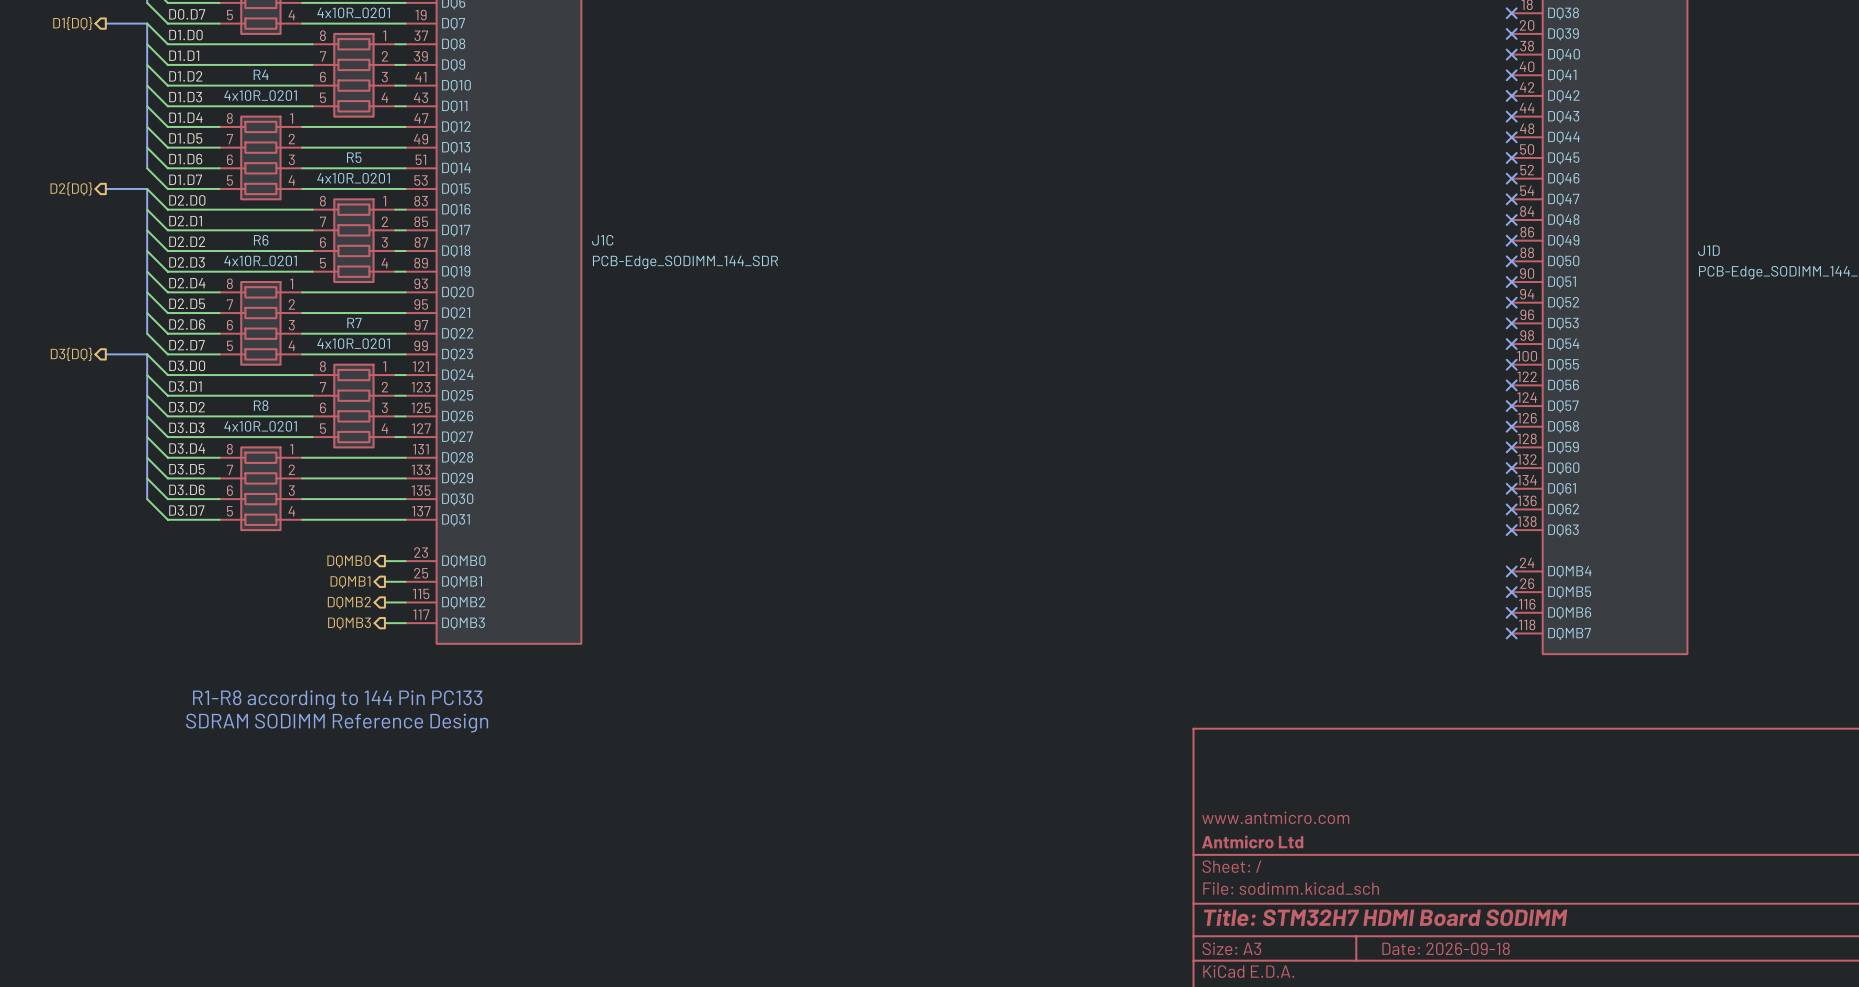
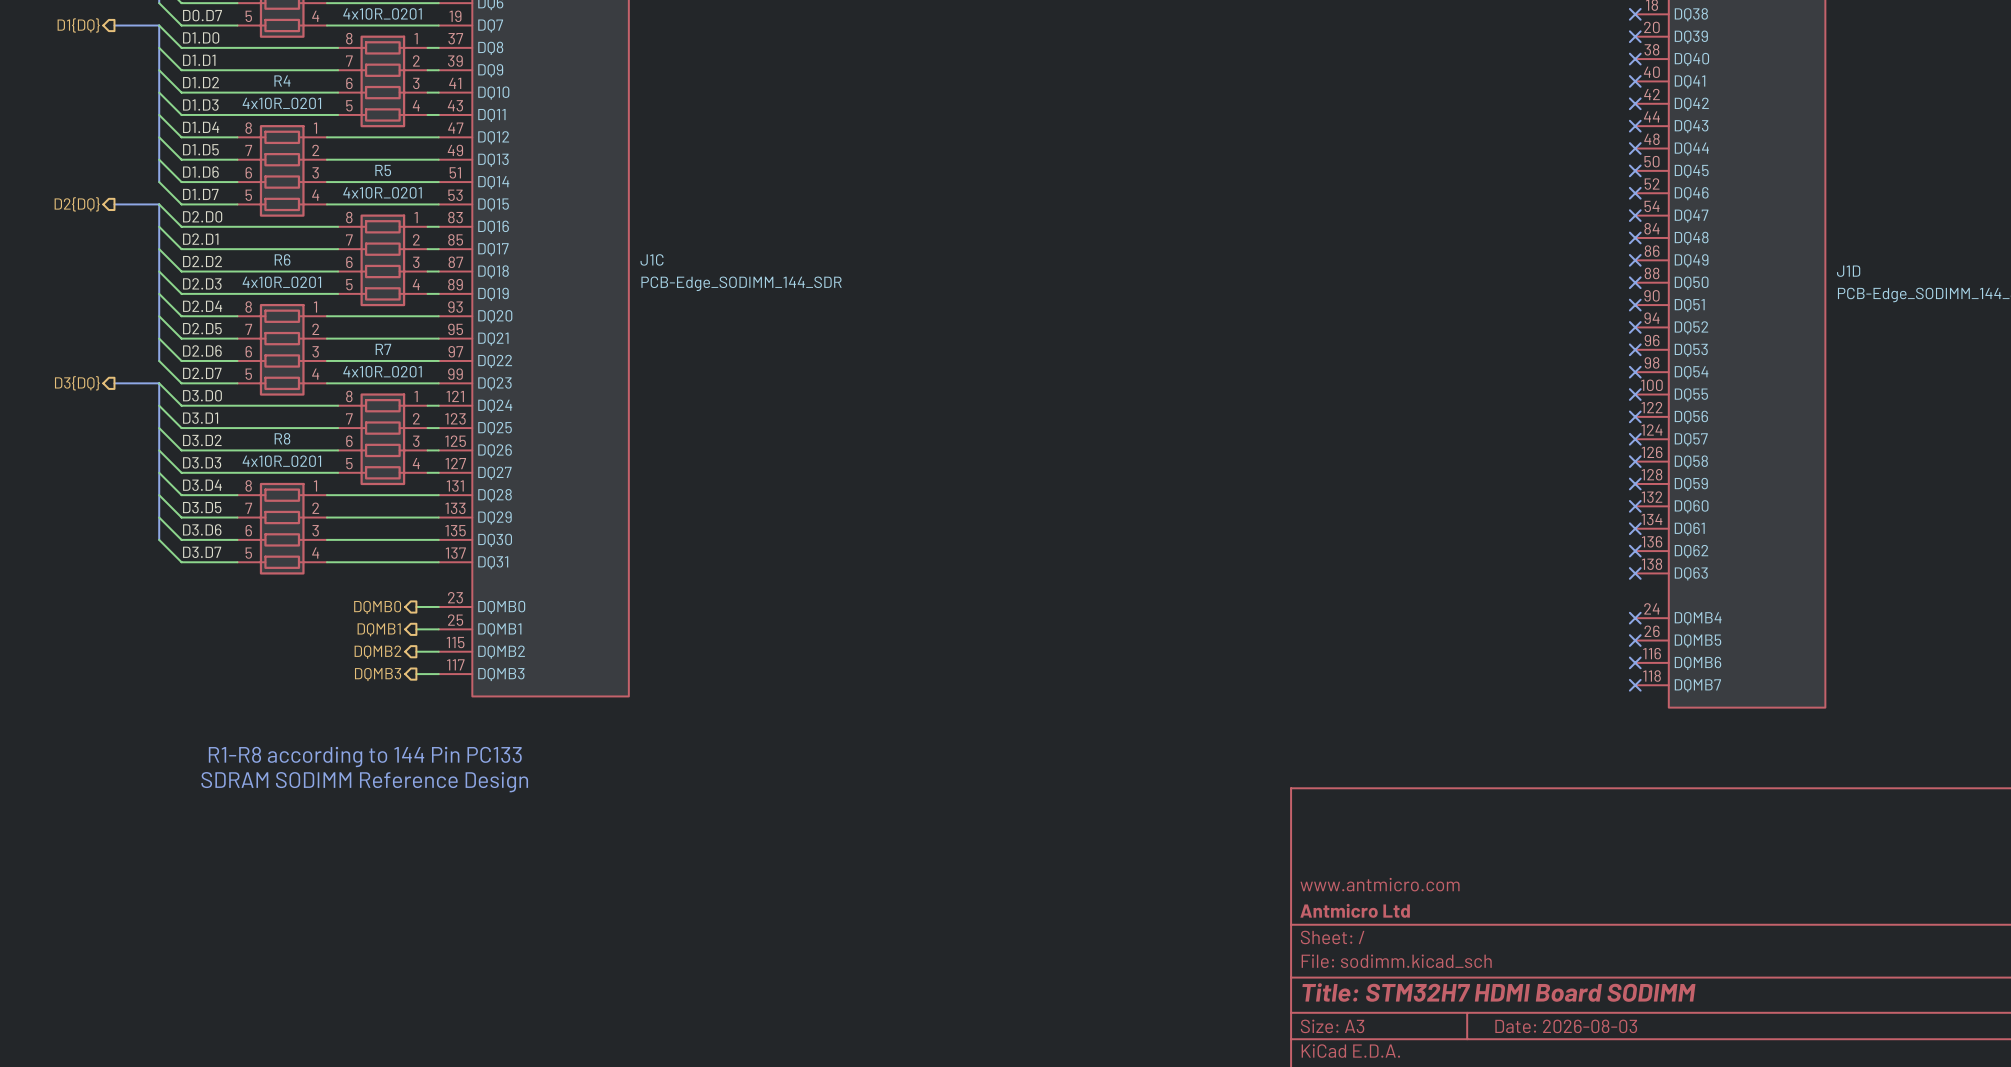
title block: Date: 2026-09-18 (1446, 948) -> Date: 2026-08-03 (1566, 1026)

